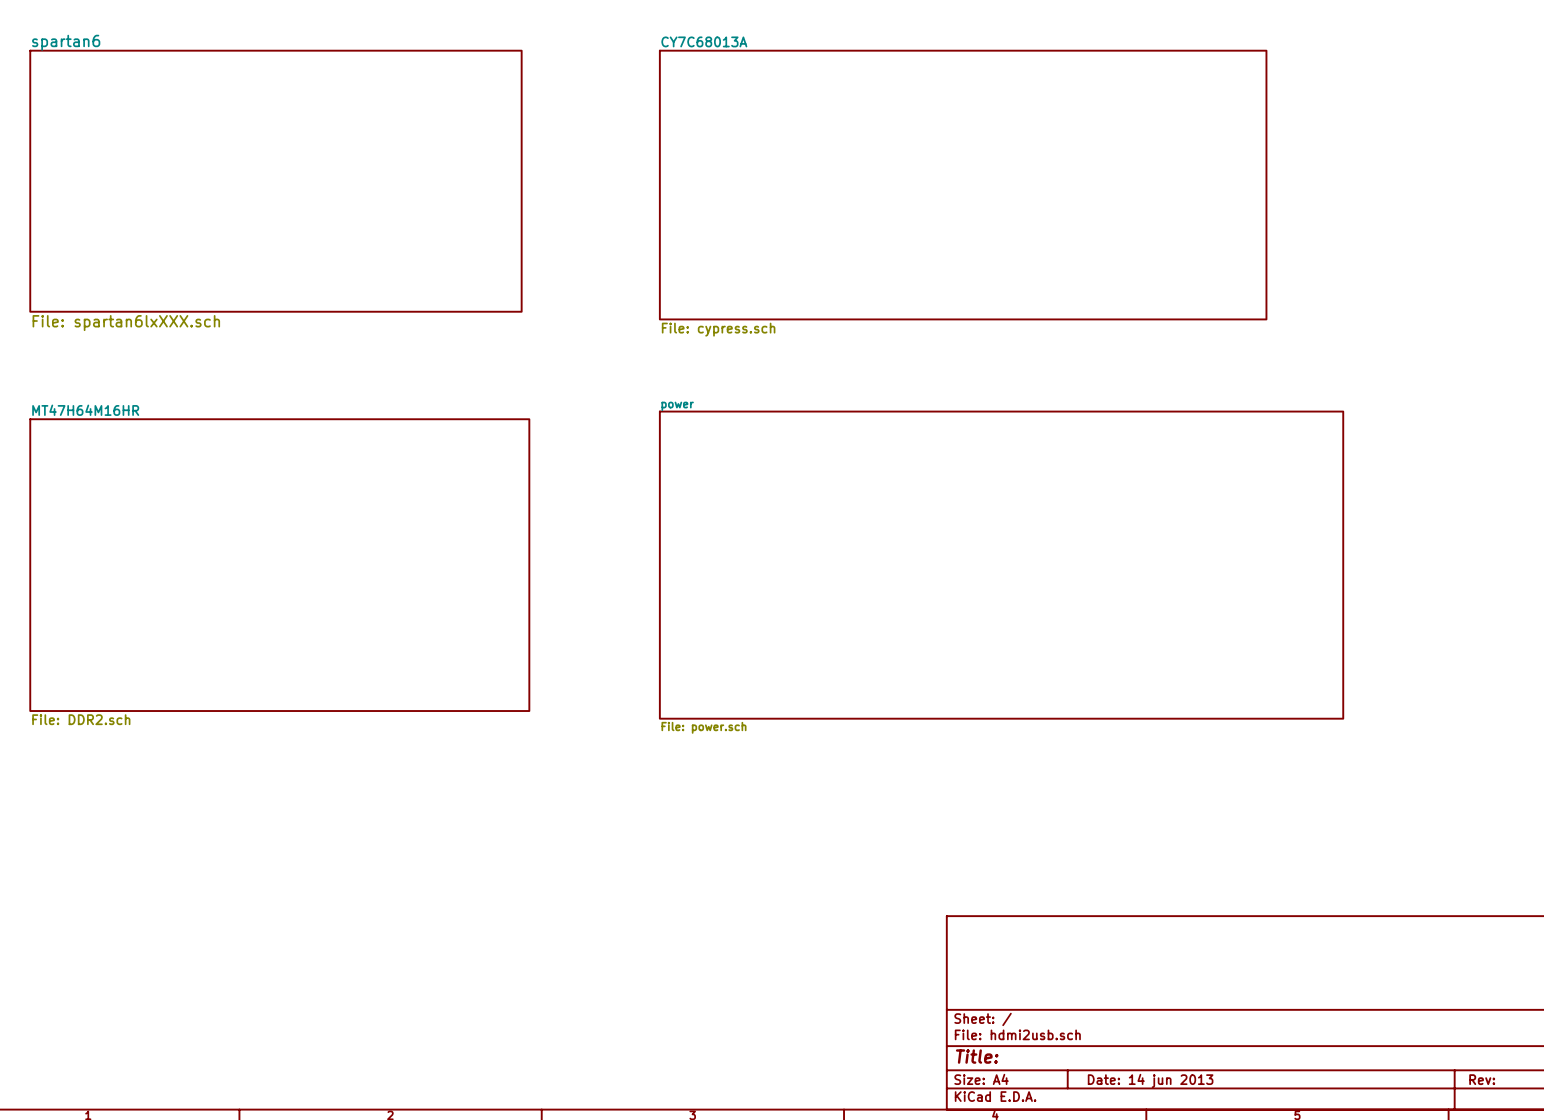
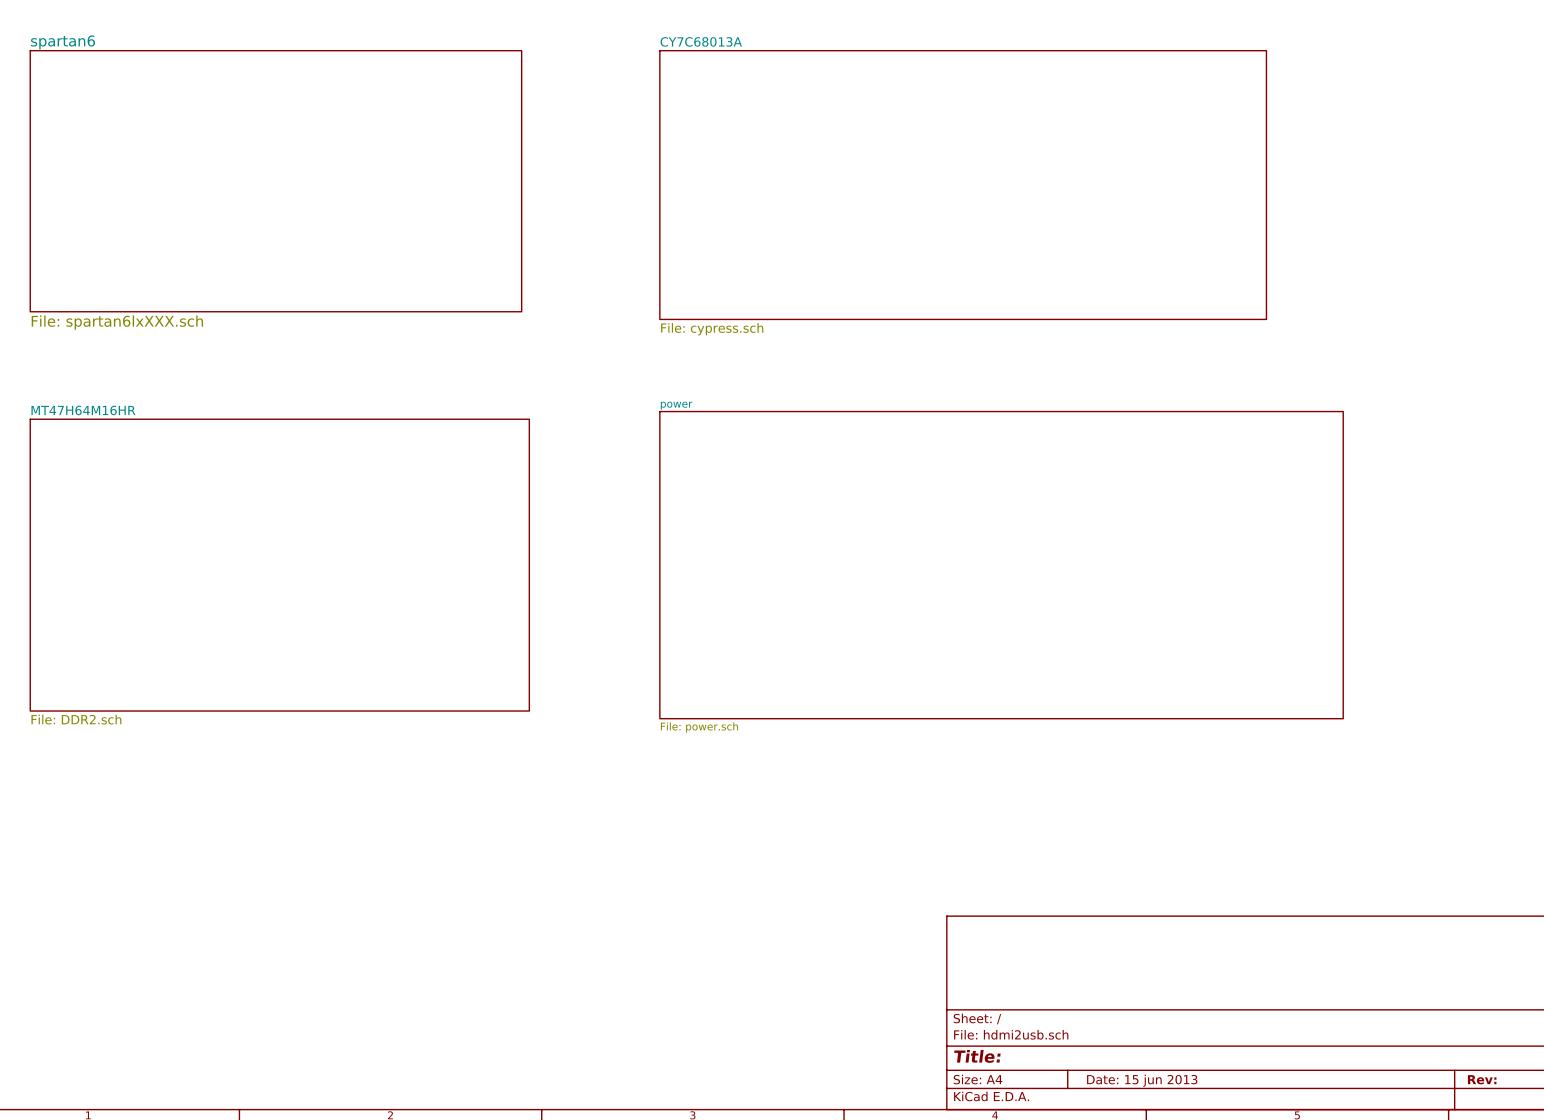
title block: Date: 14 jun 2013 (1150, 1080) -> Date: 15 jun 2013 (1142, 1080)

